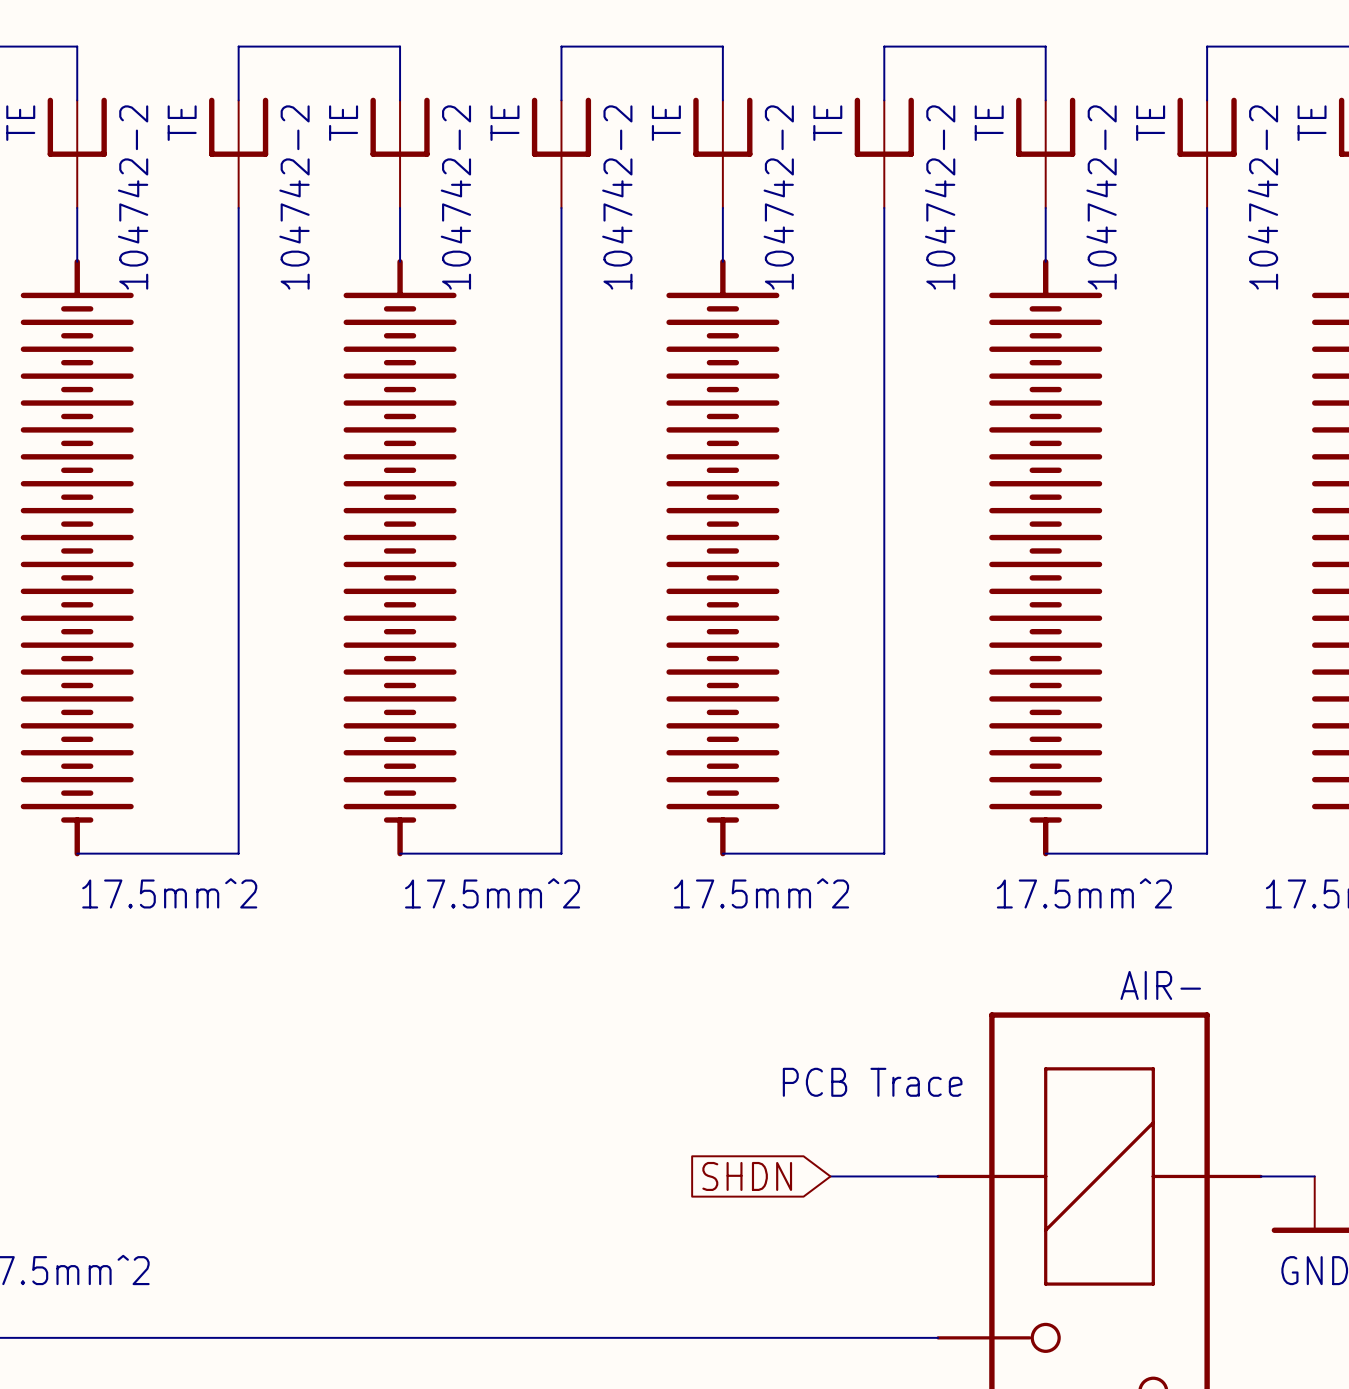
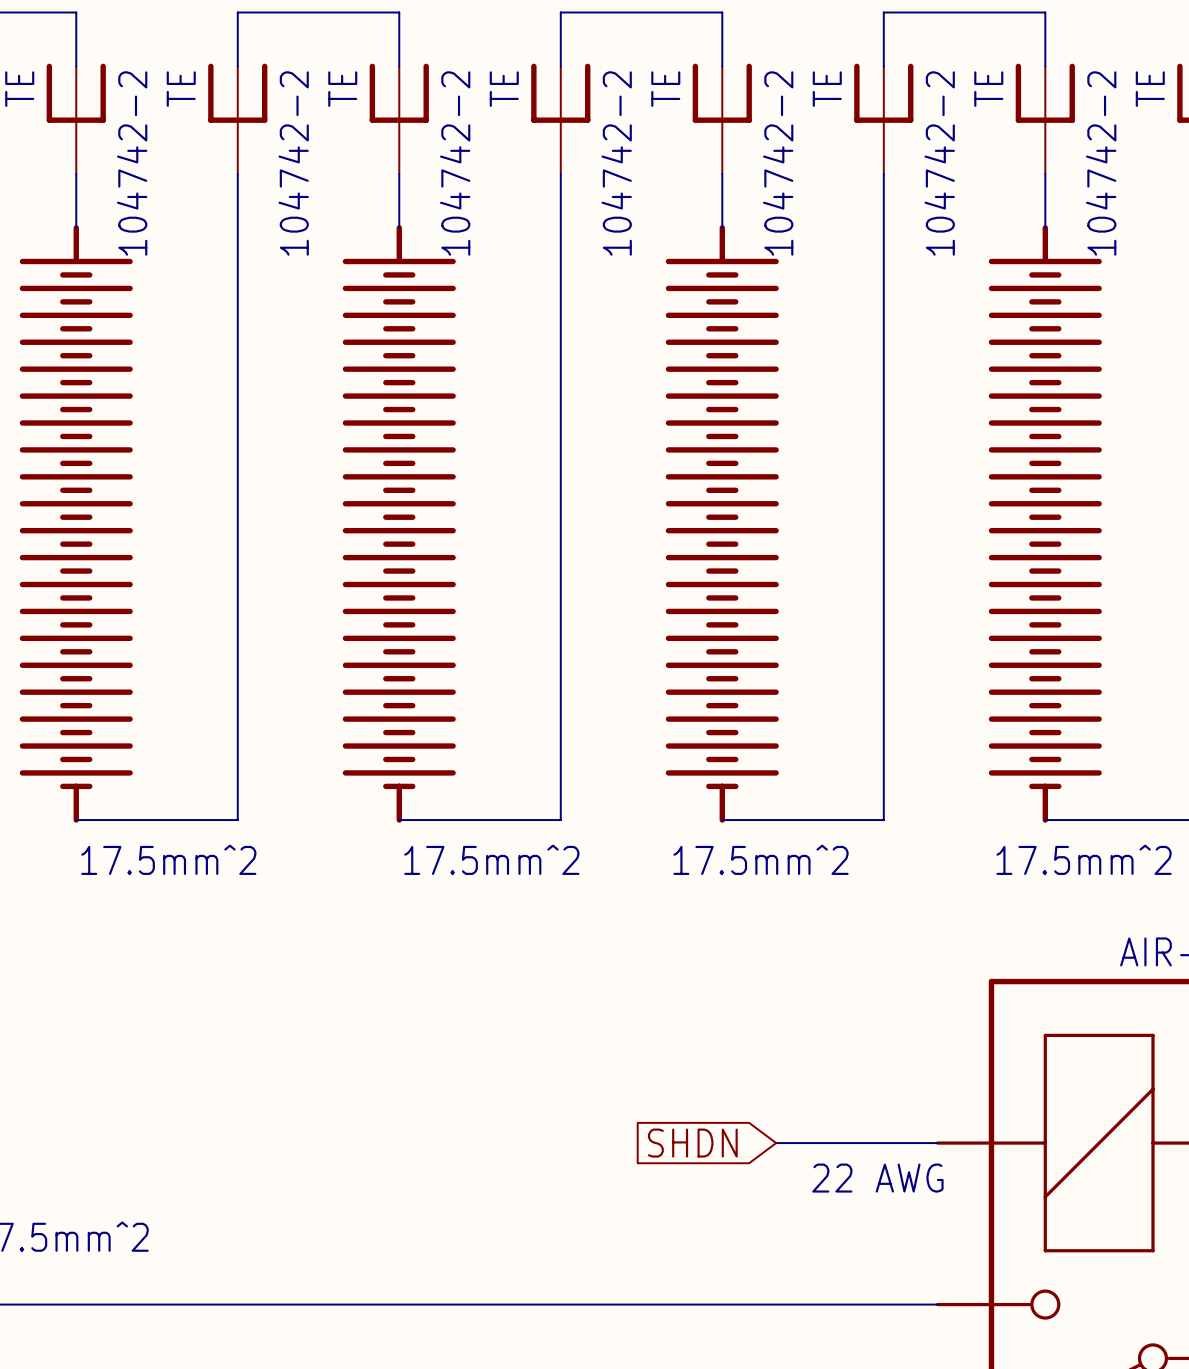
text: PCB Trace (872, 1082) -> none
global label position: SHDN (747, 1176) -> SHDN (692, 1143)
wire: none -> (776, 1143) (829, 1143)
text: none -> 22 AWG (877, 1178)

